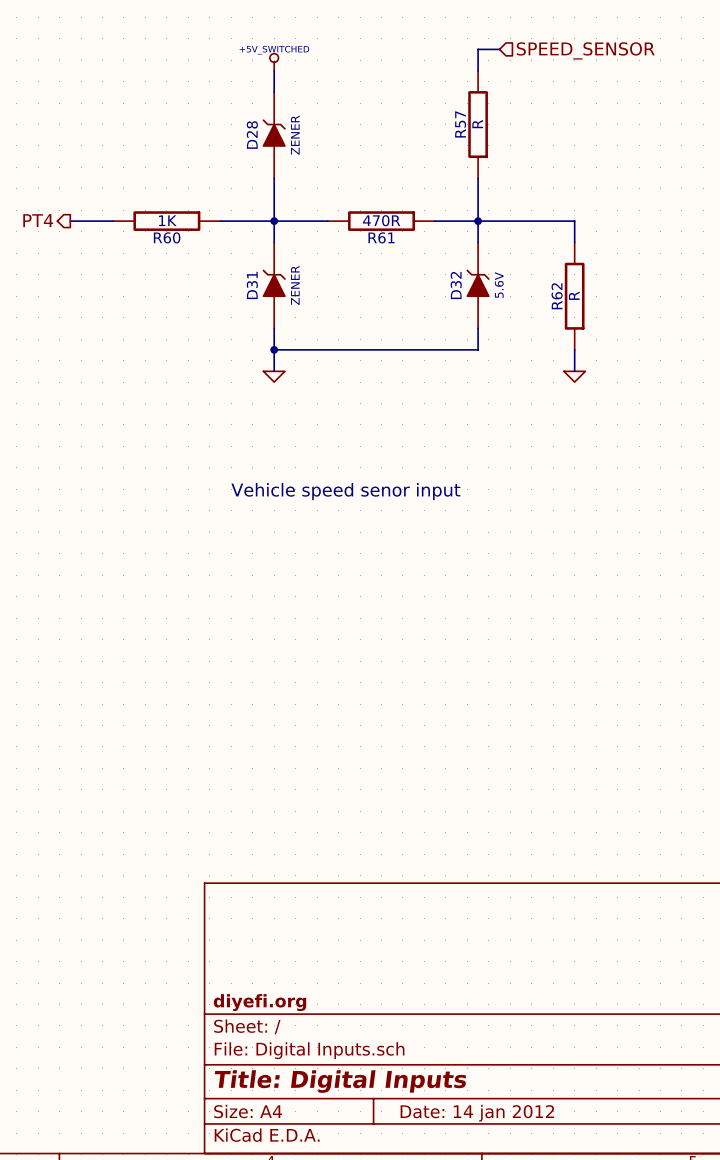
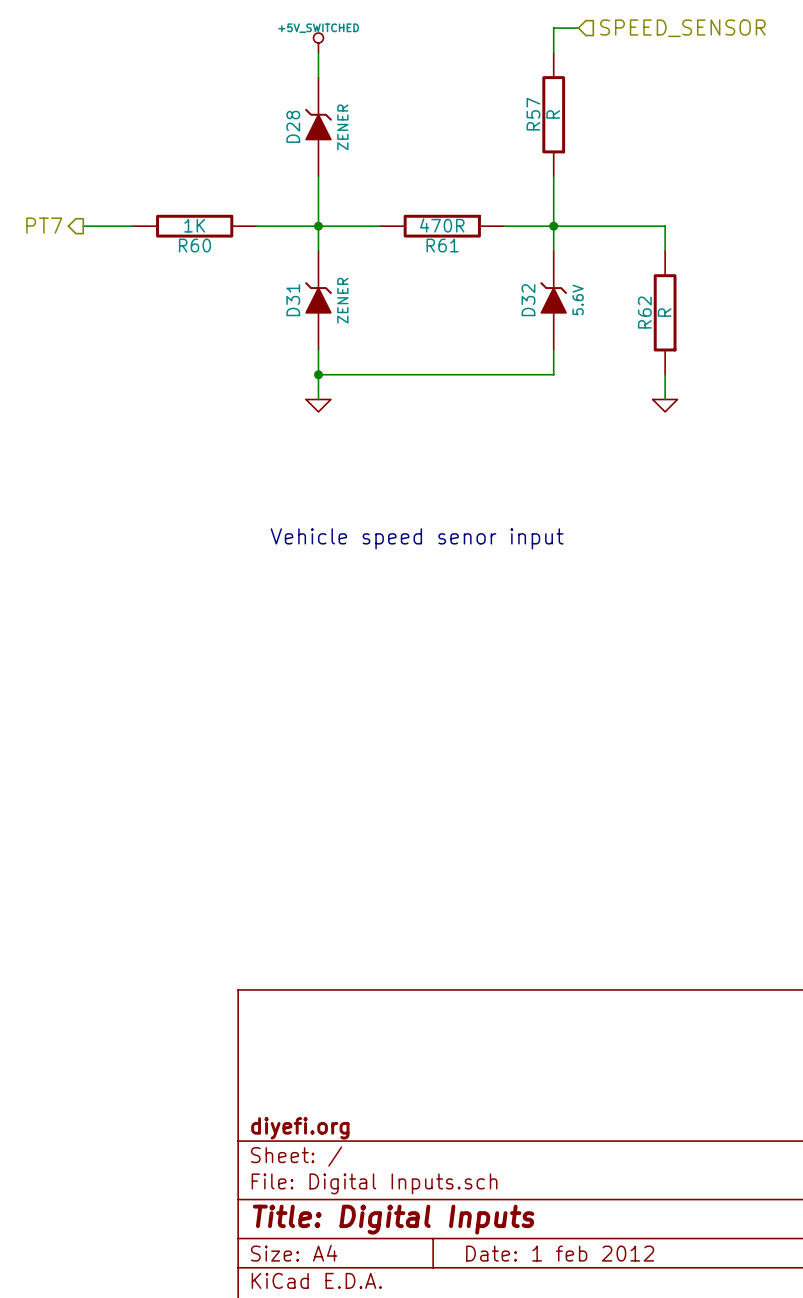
hierarchical label: PT4 (38, 220) -> PT7 (44, 225)
title block: Date: 14 jan 2012 (477, 1113) -> Date: 1 feb 2012 (560, 1253)

